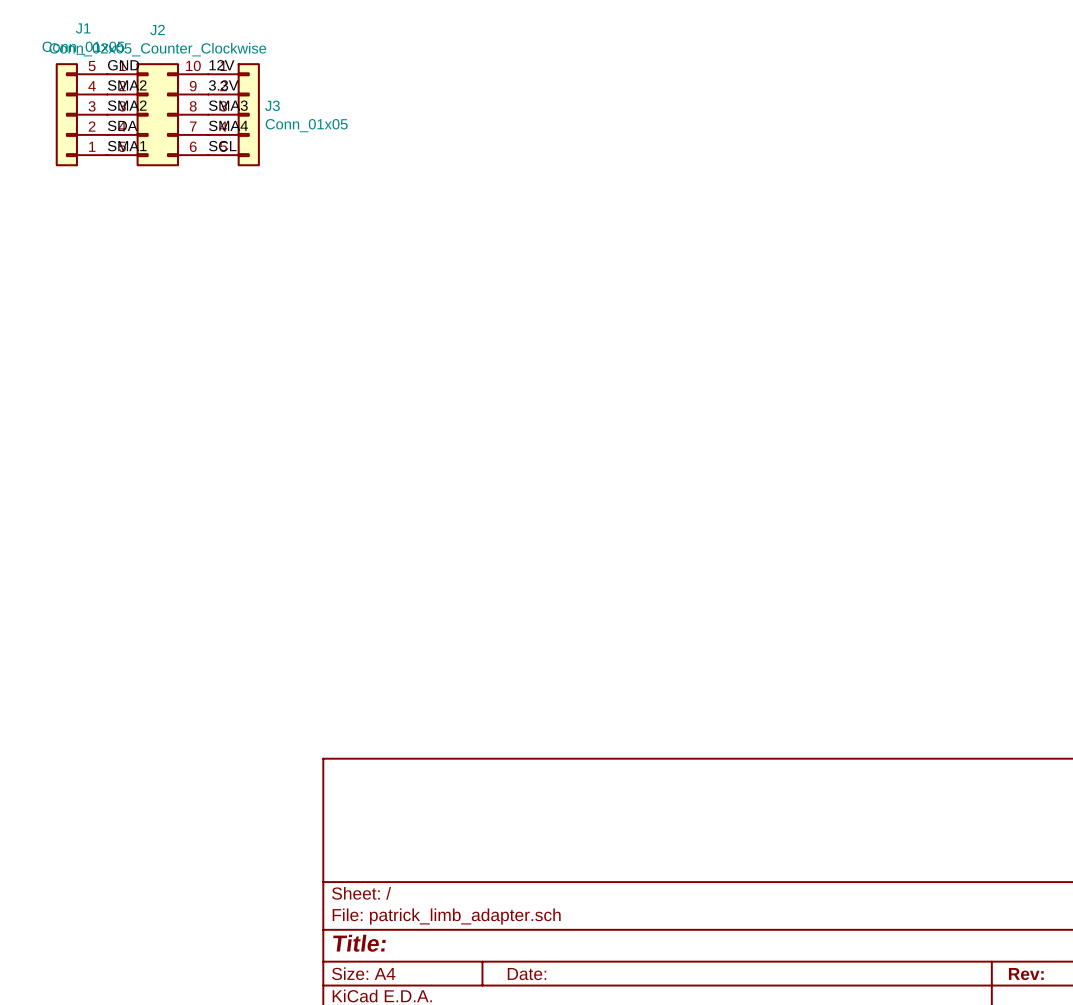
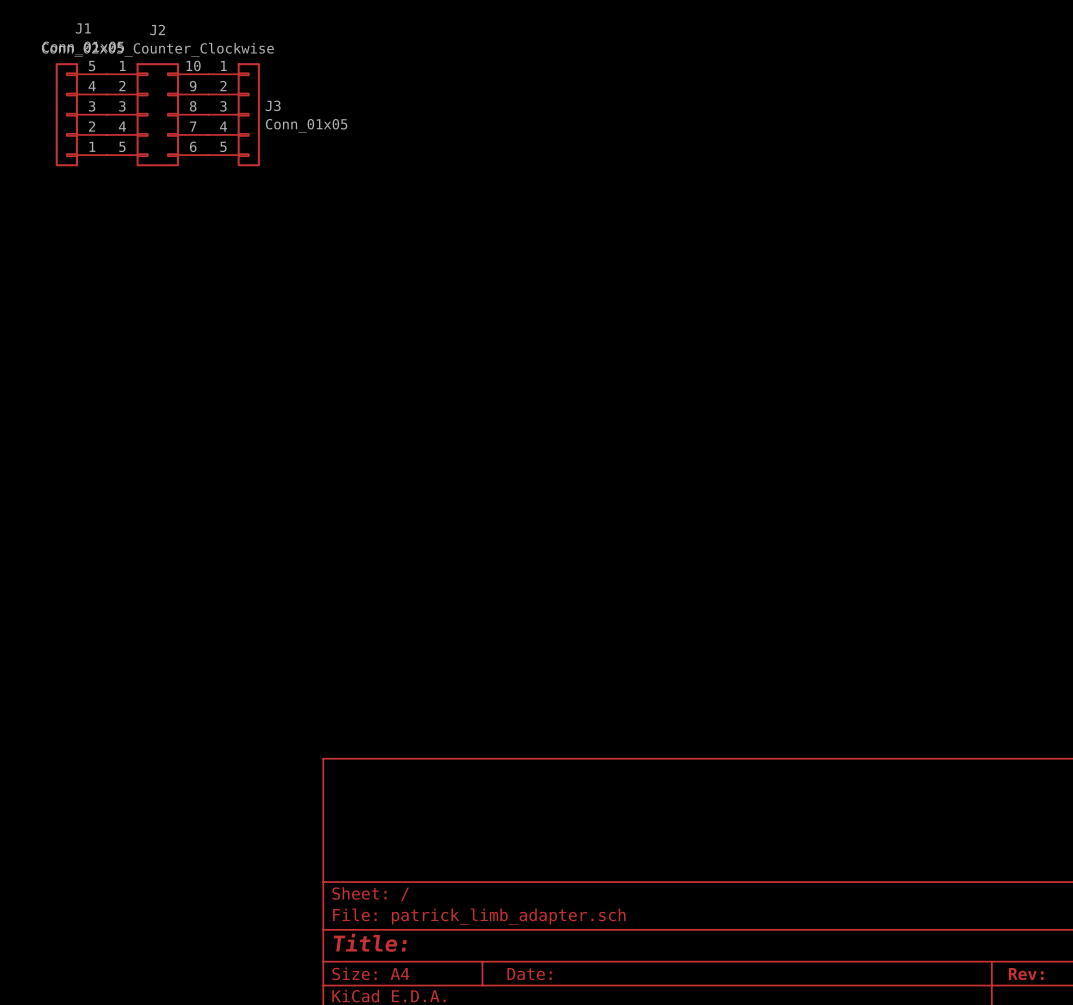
label: GND (123, 65) -> none
label: 12V (221, 65) -> none
label: SMA2 (127, 85) -> none
label: 3.3V (223, 85) -> none
label: SMA2 (127, 105) -> none
label: SMA3 (228, 105) -> none
label: SDA (122, 125) -> none
label: SMA4 (228, 125) -> none
label: SMA1 (127, 146) -> none
label: SCL (222, 146) -> none

